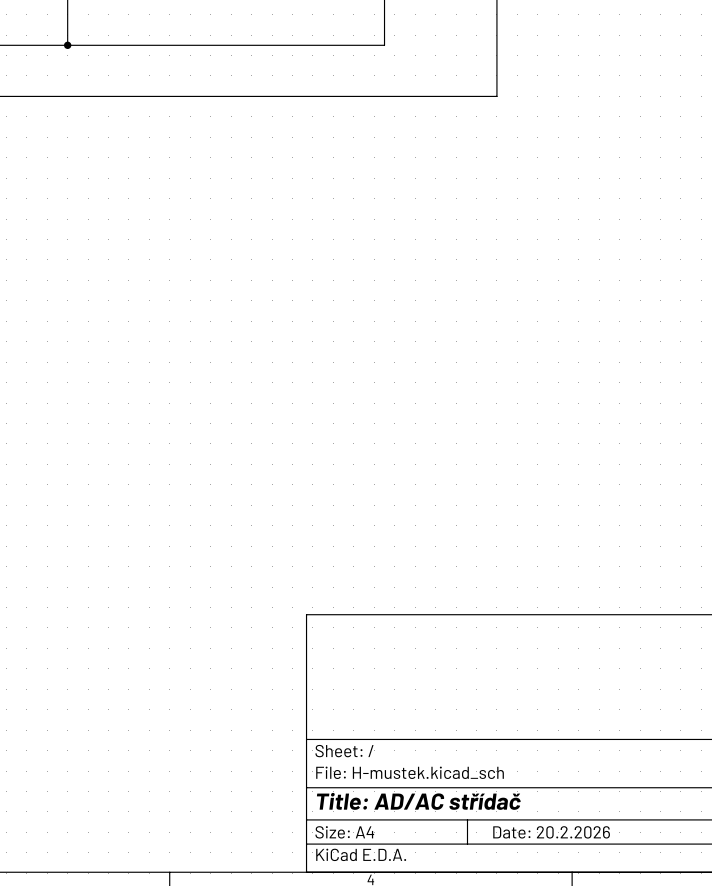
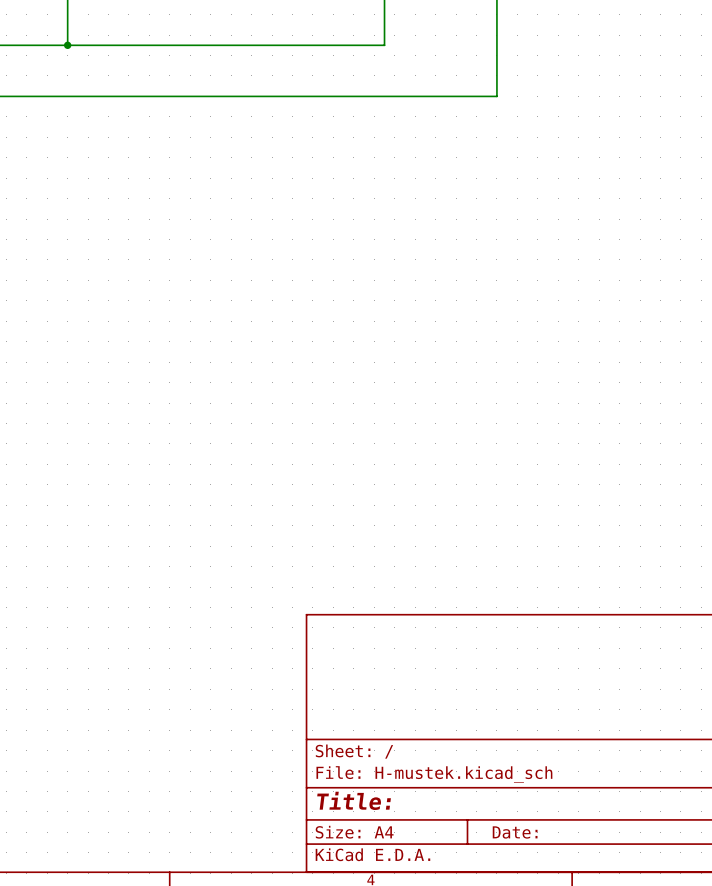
title block: Title: AD/AC střídač (418, 801) -> Title: (354, 800)
title block: Date: 20.2.2026 (551, 832) -> Date: (515, 832)

